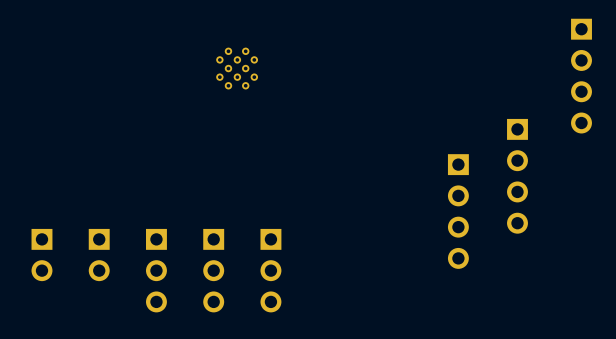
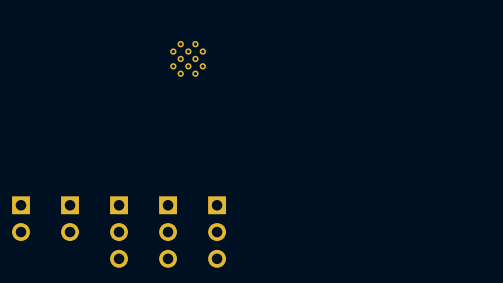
part: (581, 76) -> none
part: (517, 176) -> none
part: (458, 211) -> none

